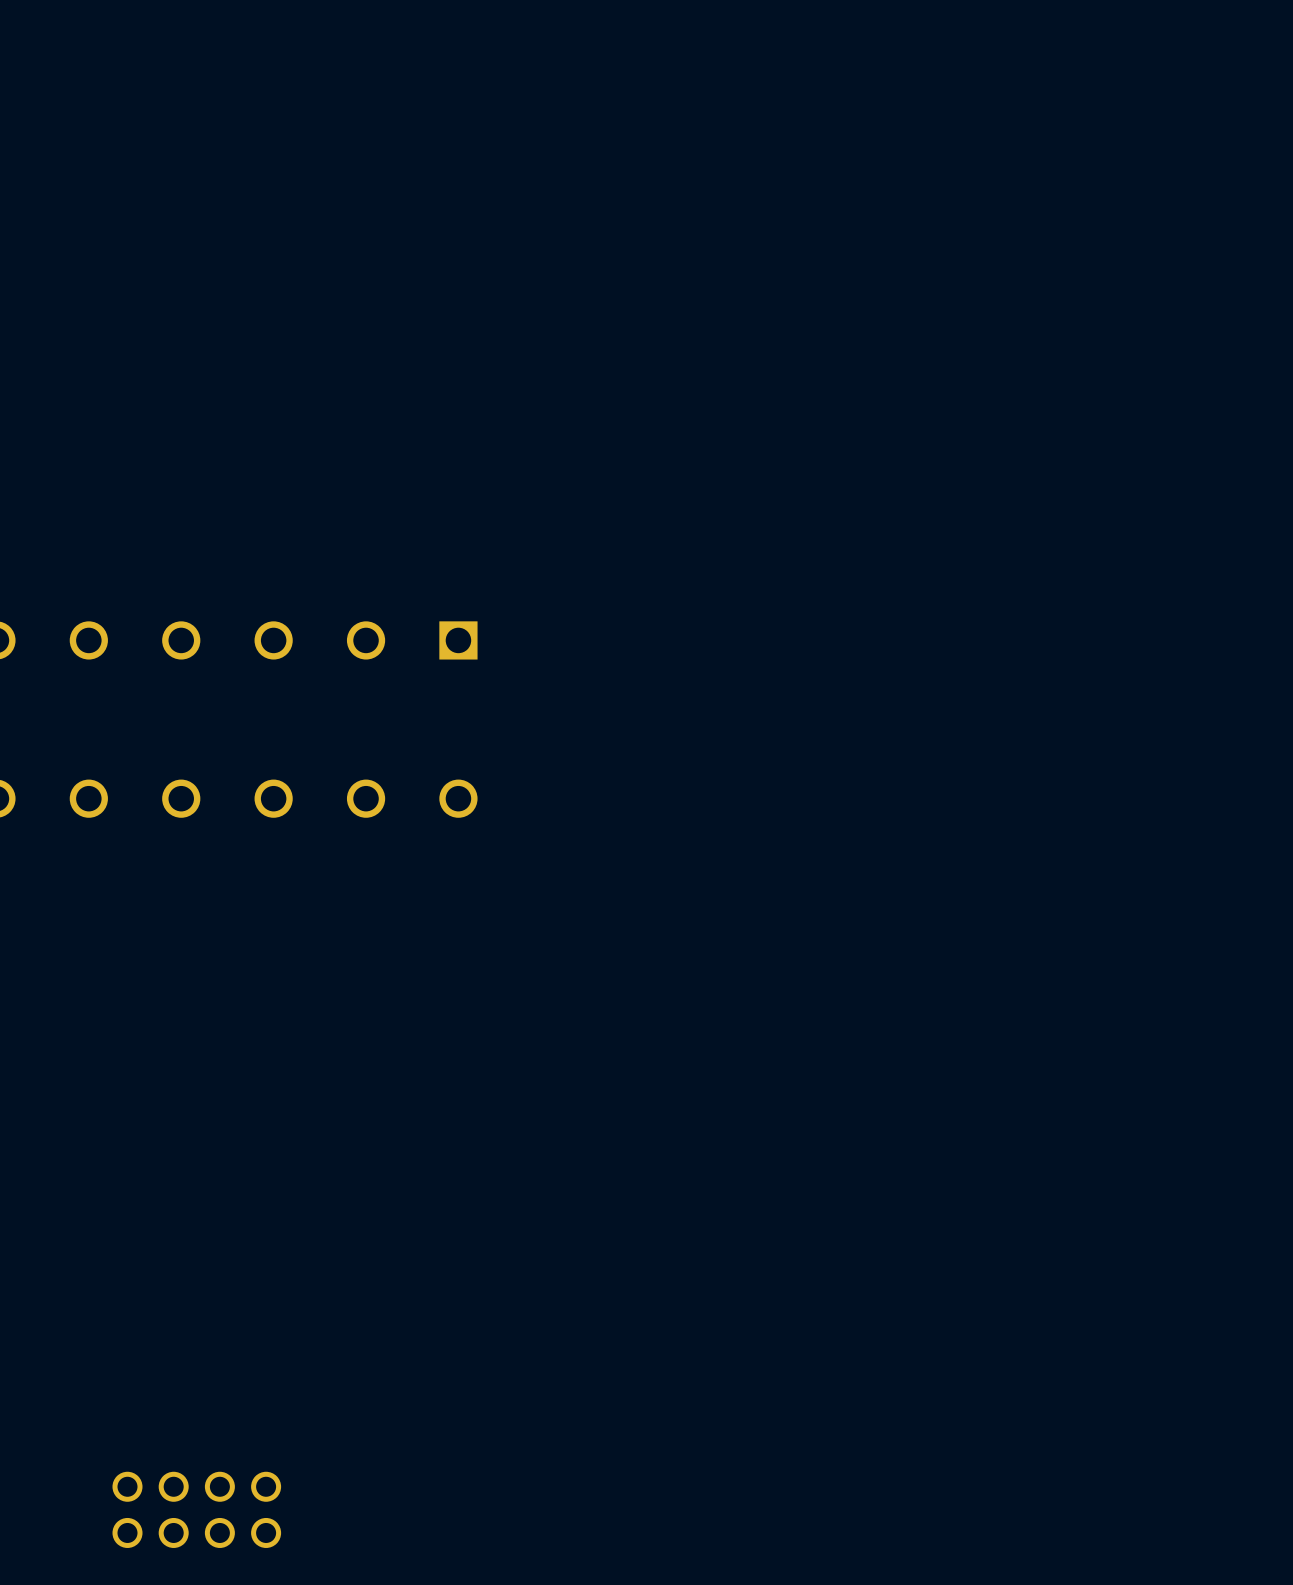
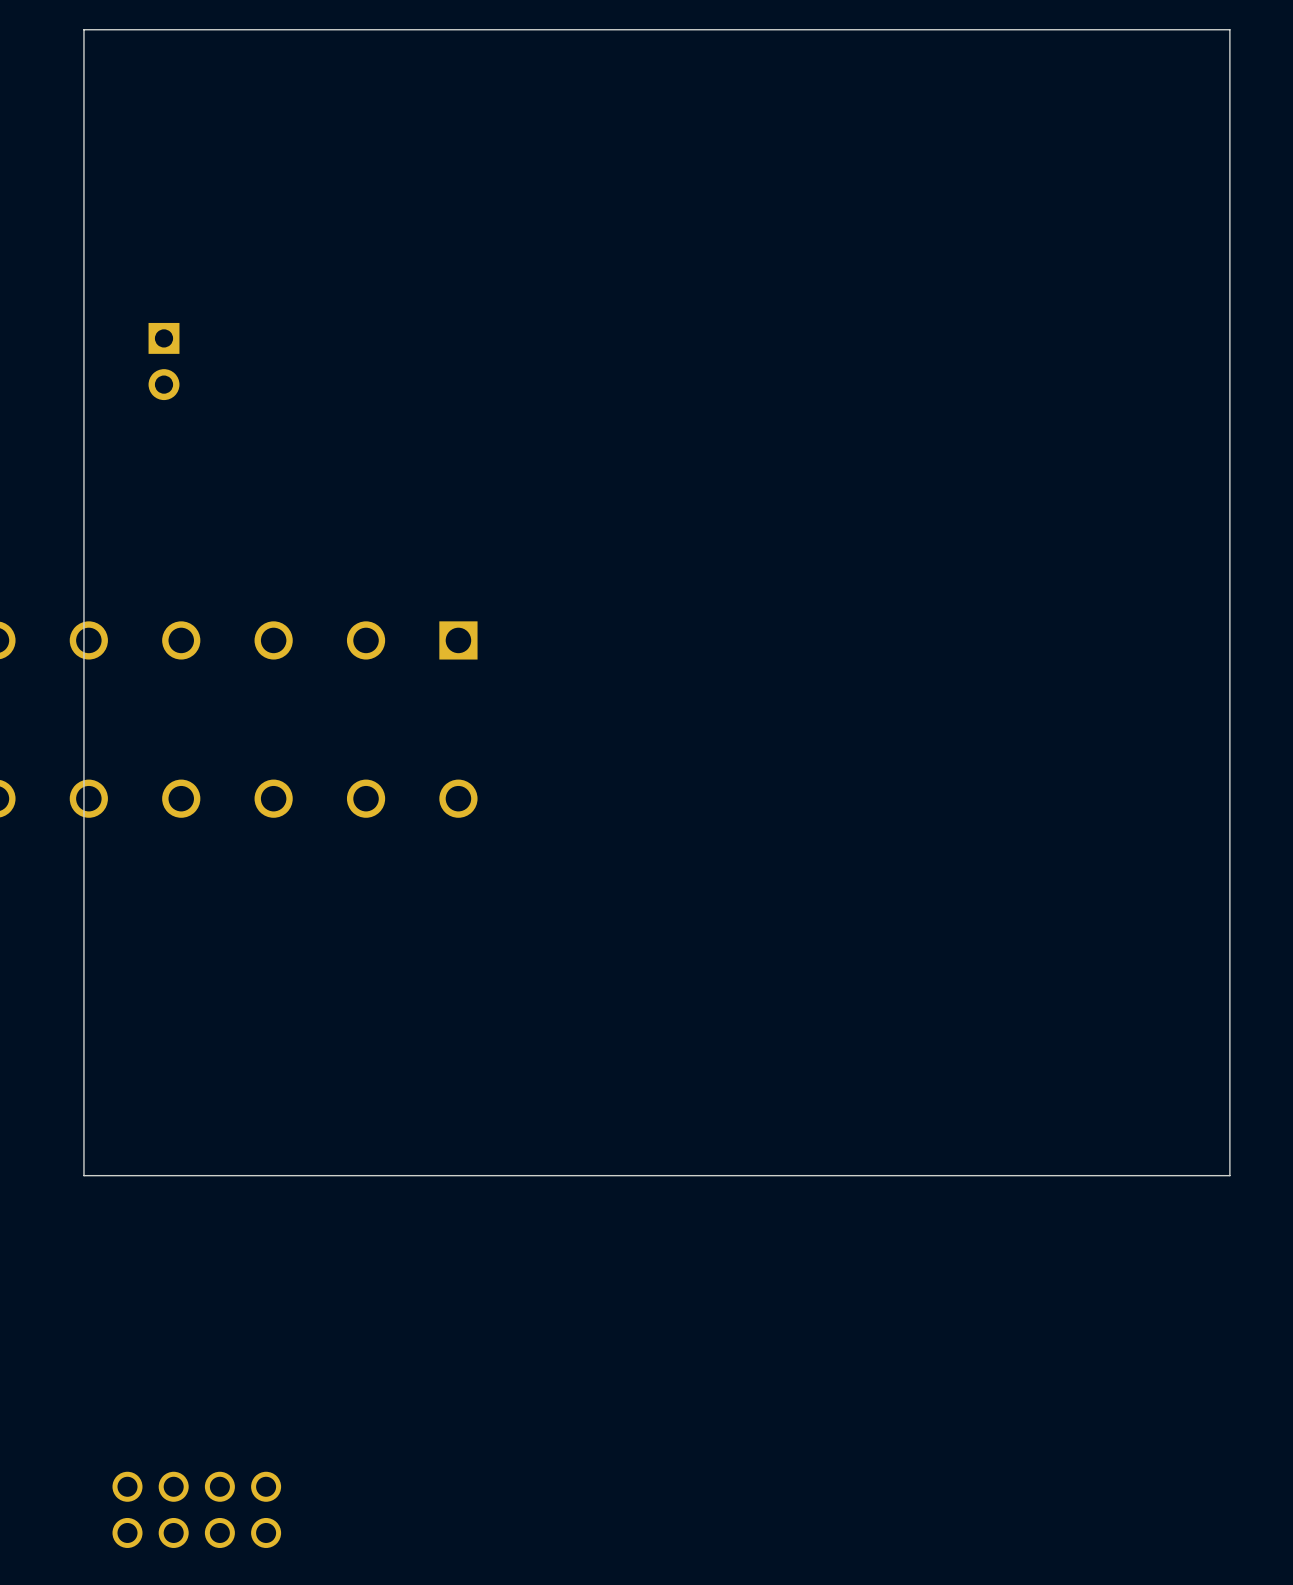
board edge: none -> (1229, 29) (83, 29) (83, 1175) (1229, 1175) (1229, 29)
part: none -> (164, 361)

